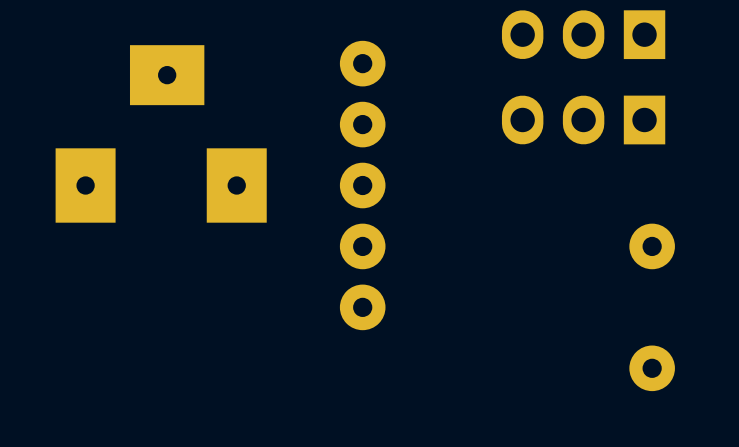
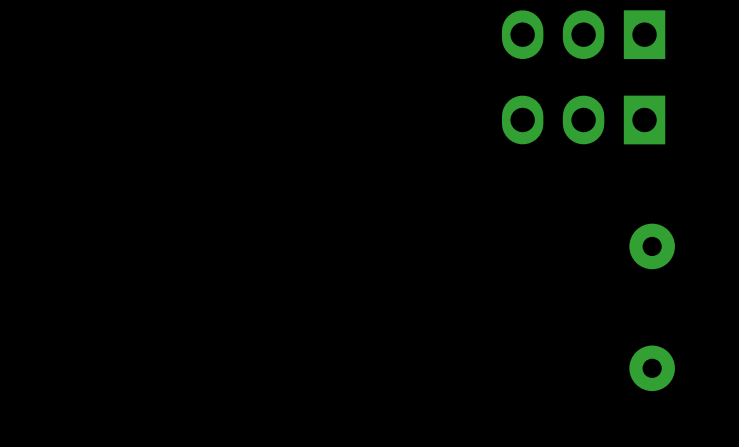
part: (161, 133) -> none
part: (362, 185) -> none

